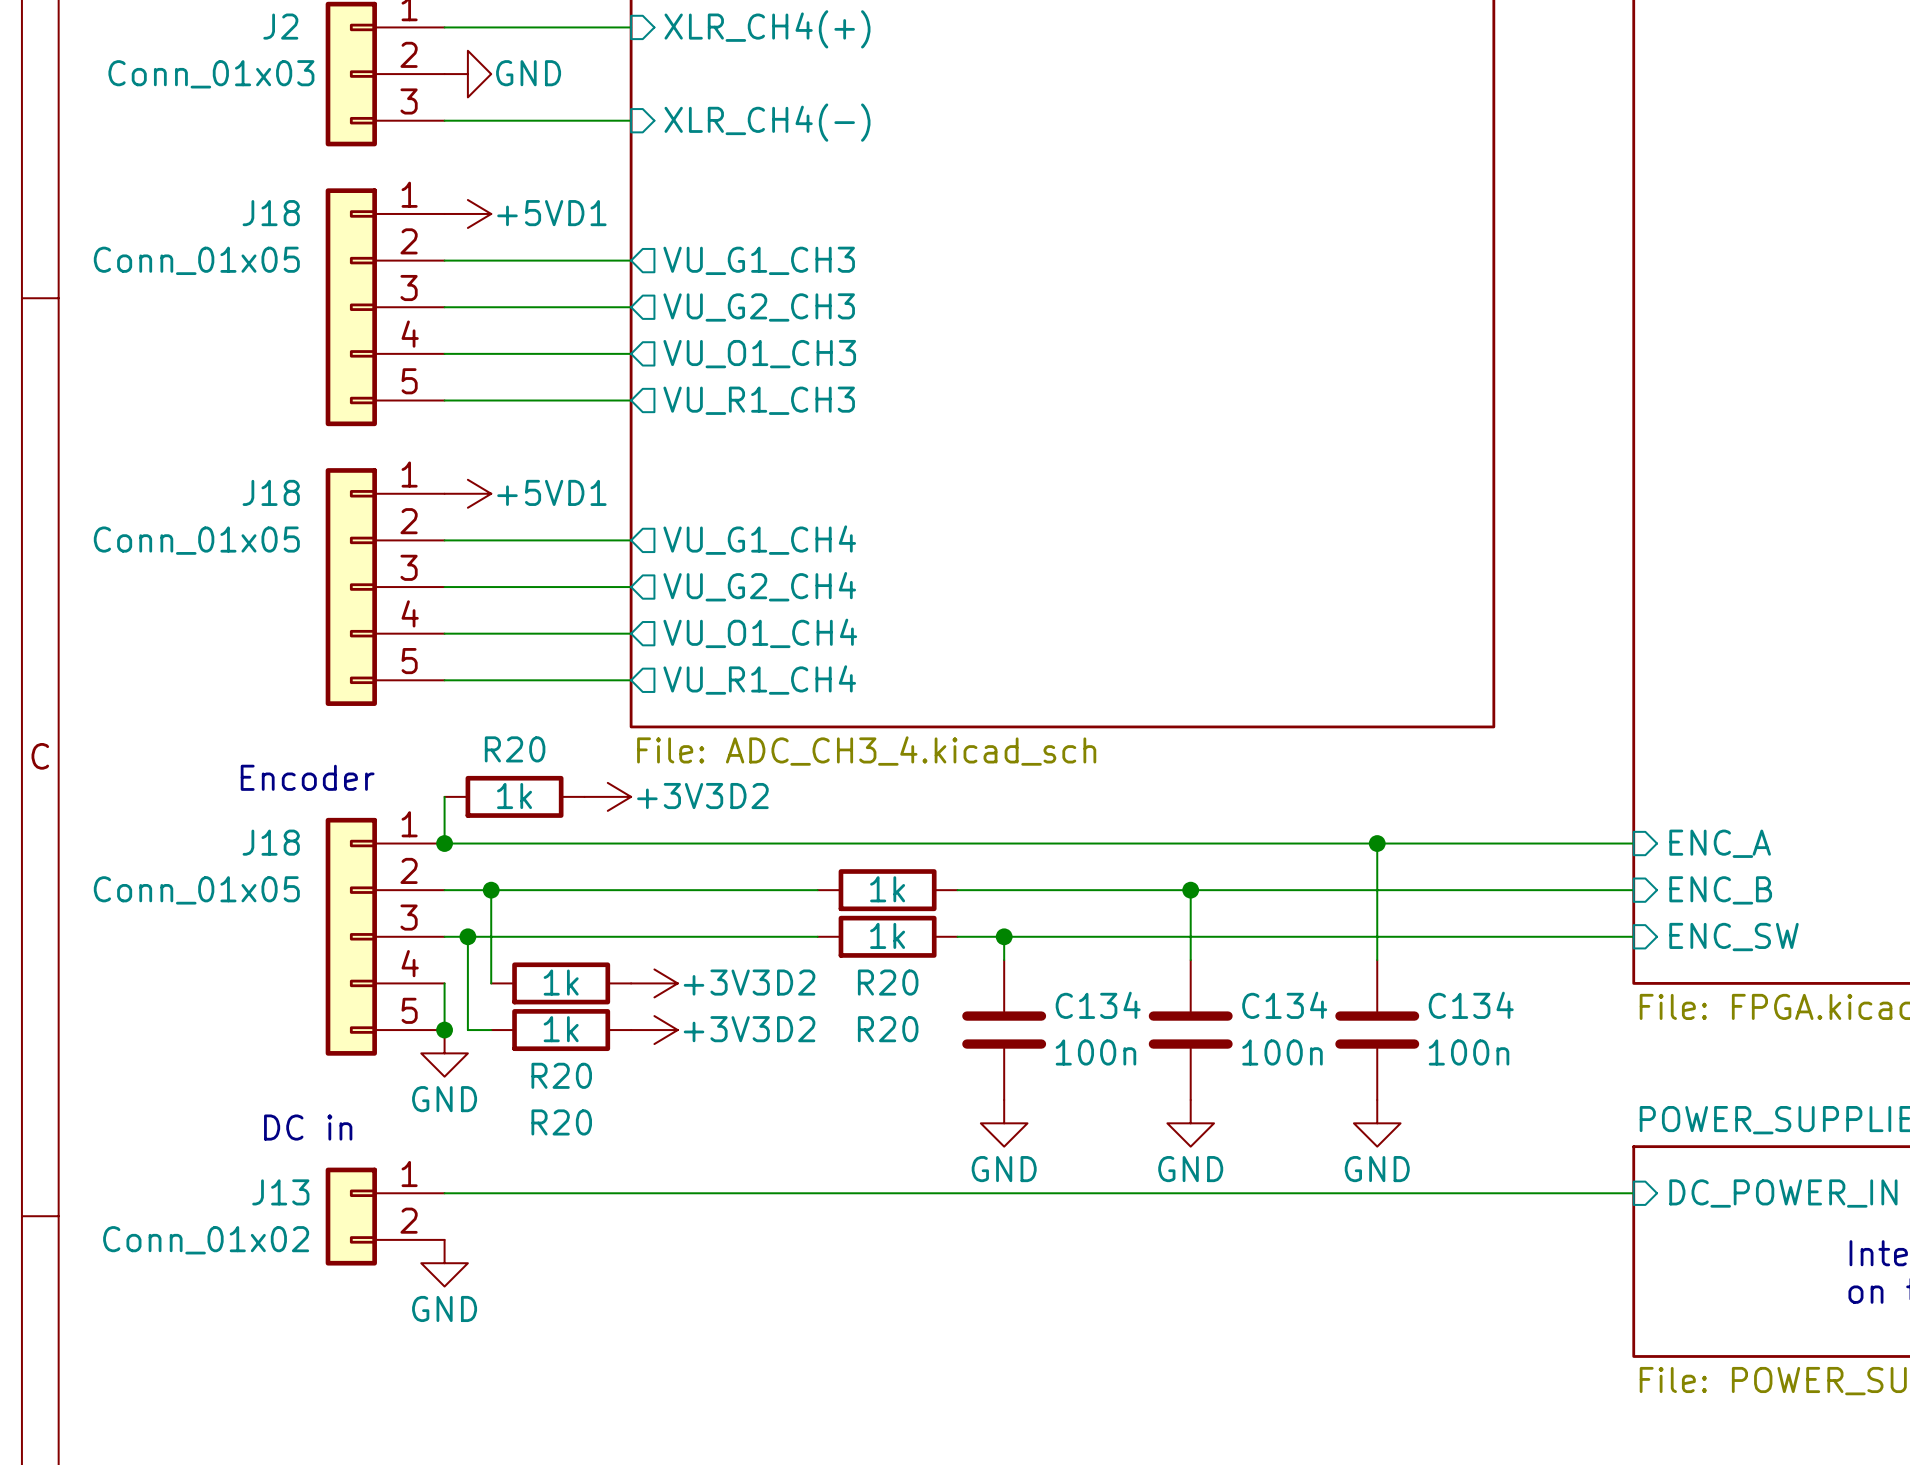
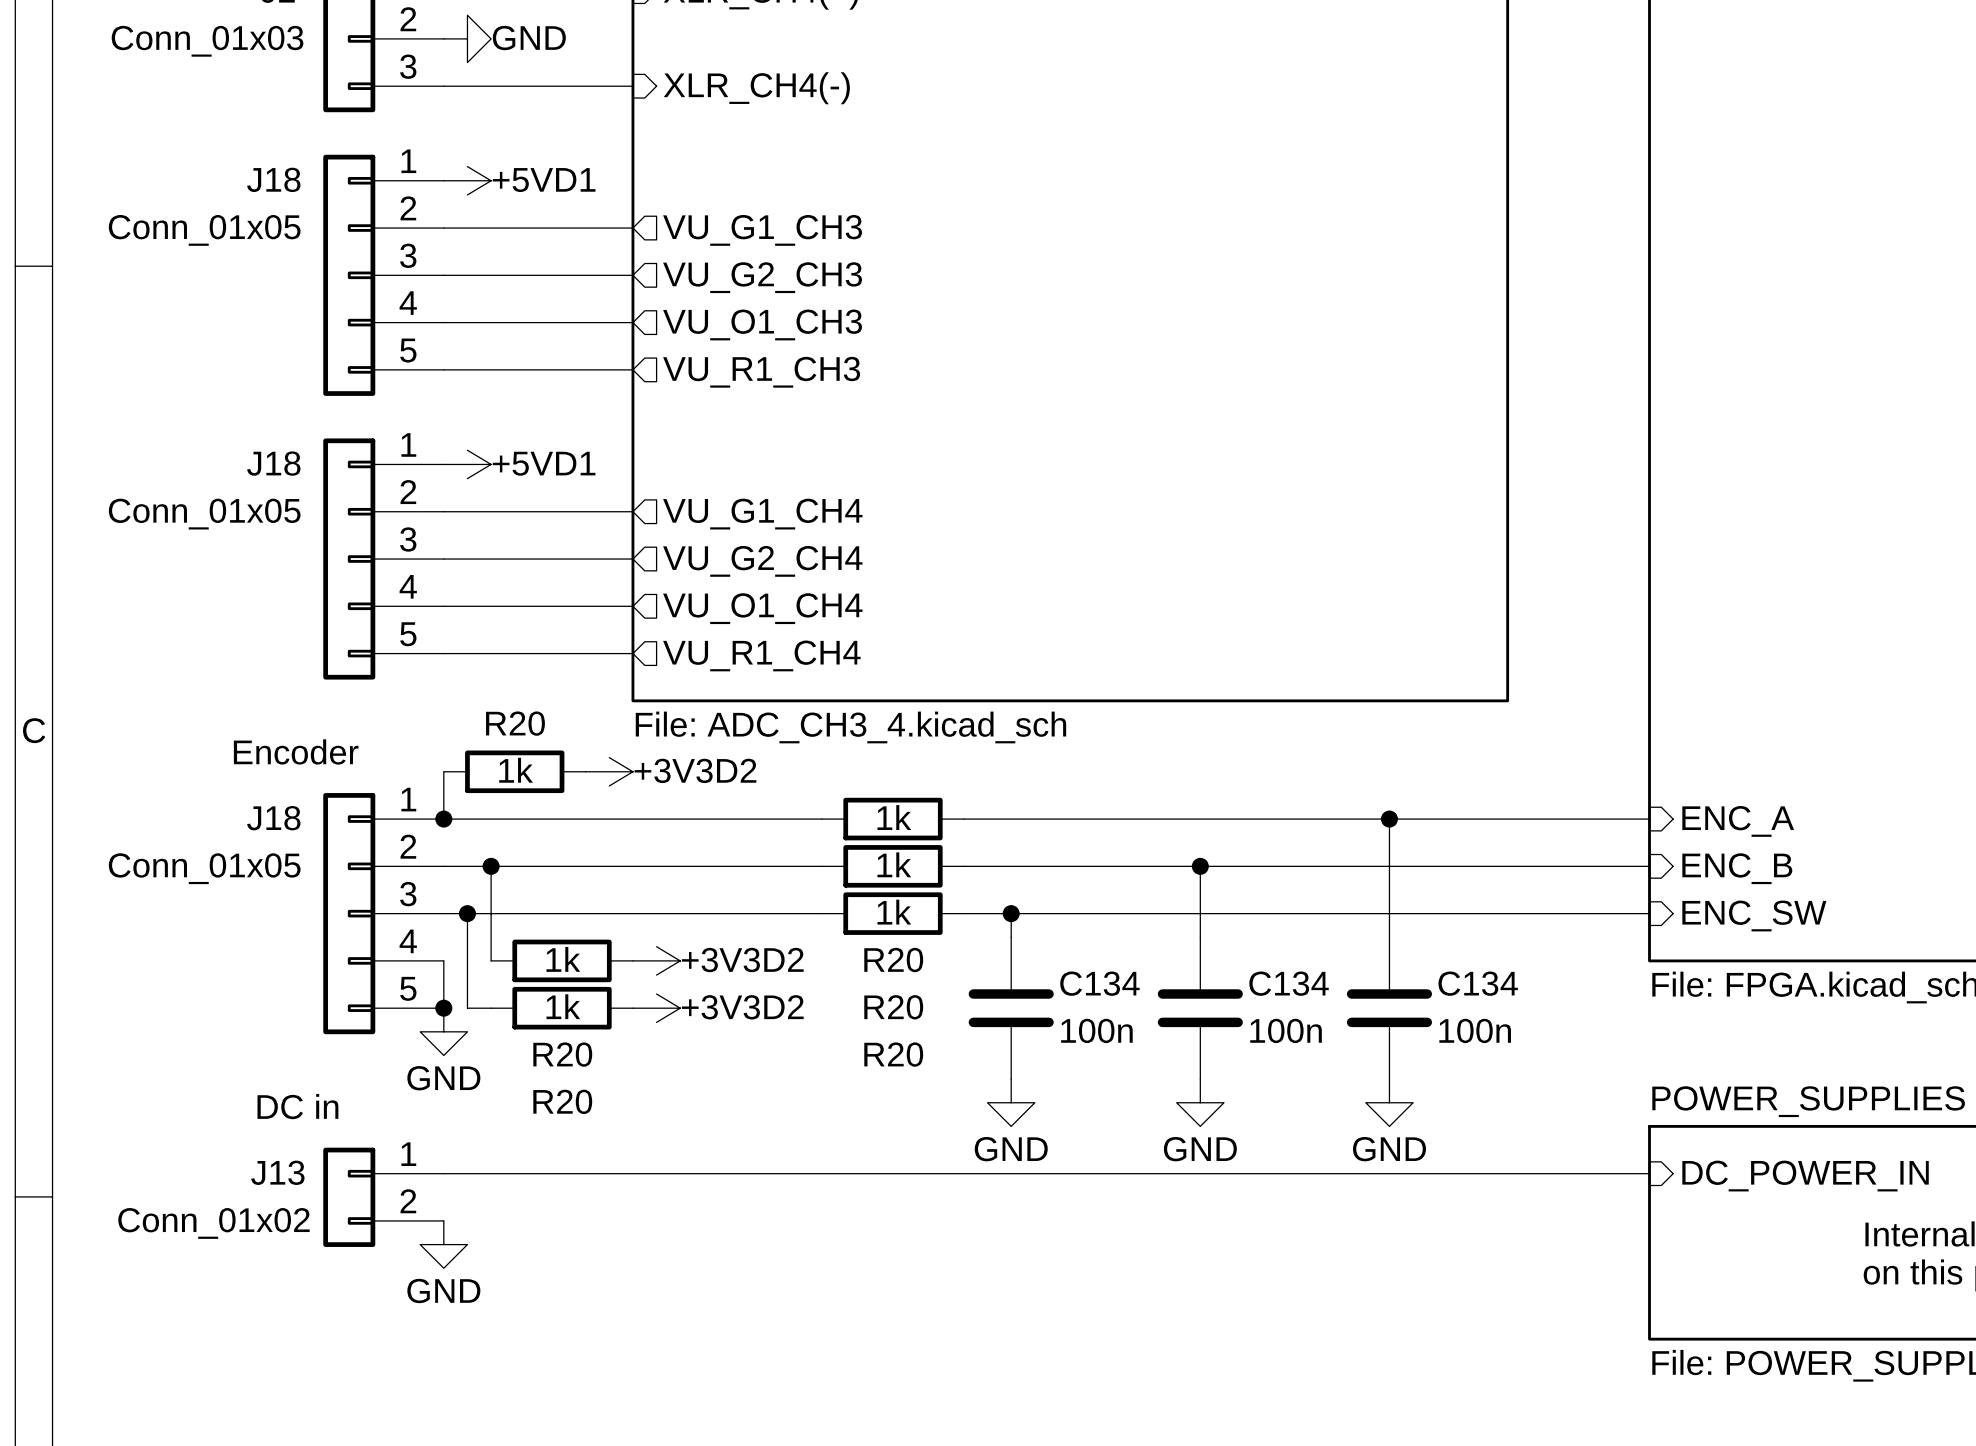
wire: (817, 843) (957, 843) -> none
R20: none -> 1k (892, 819)
R20 name position: R20 (888, 1029) -> R20 (893, 1054)

